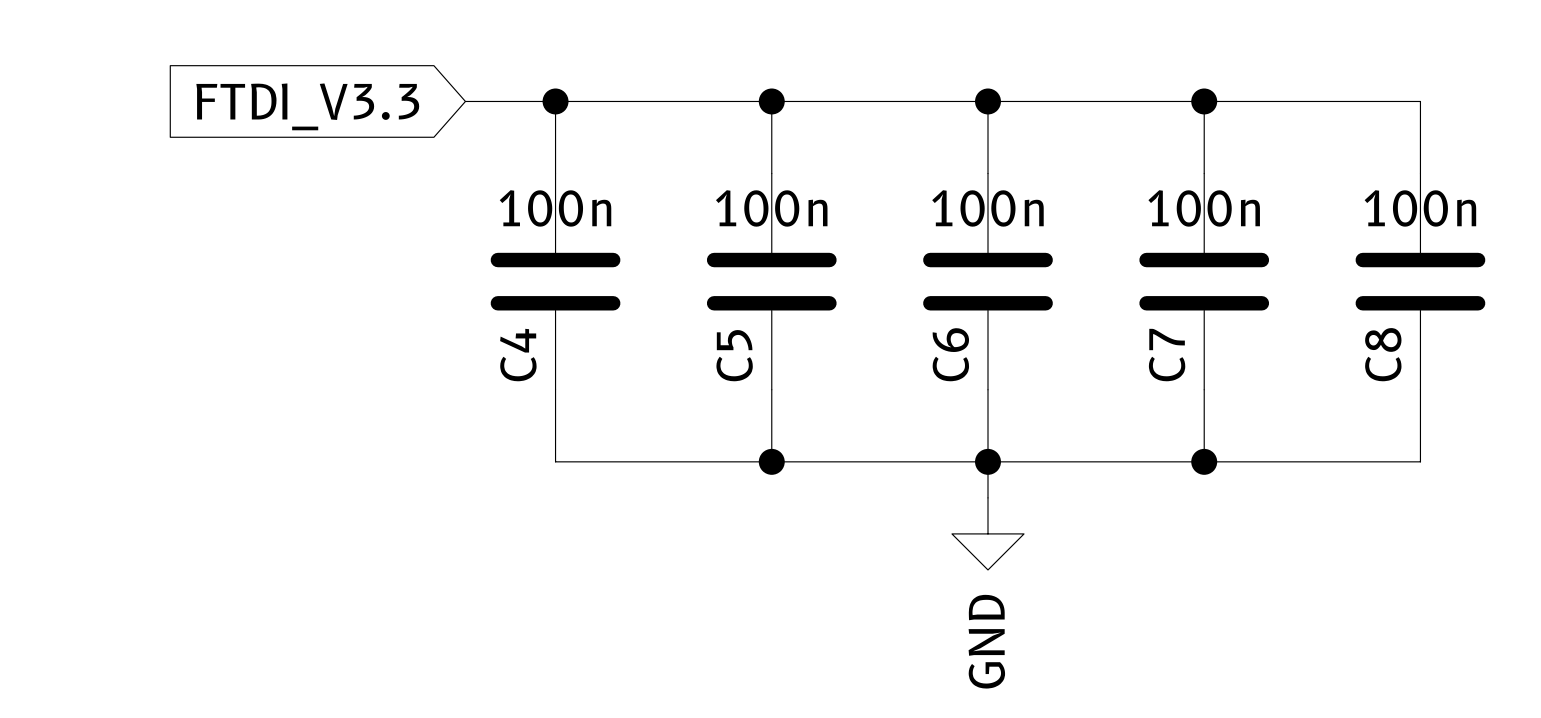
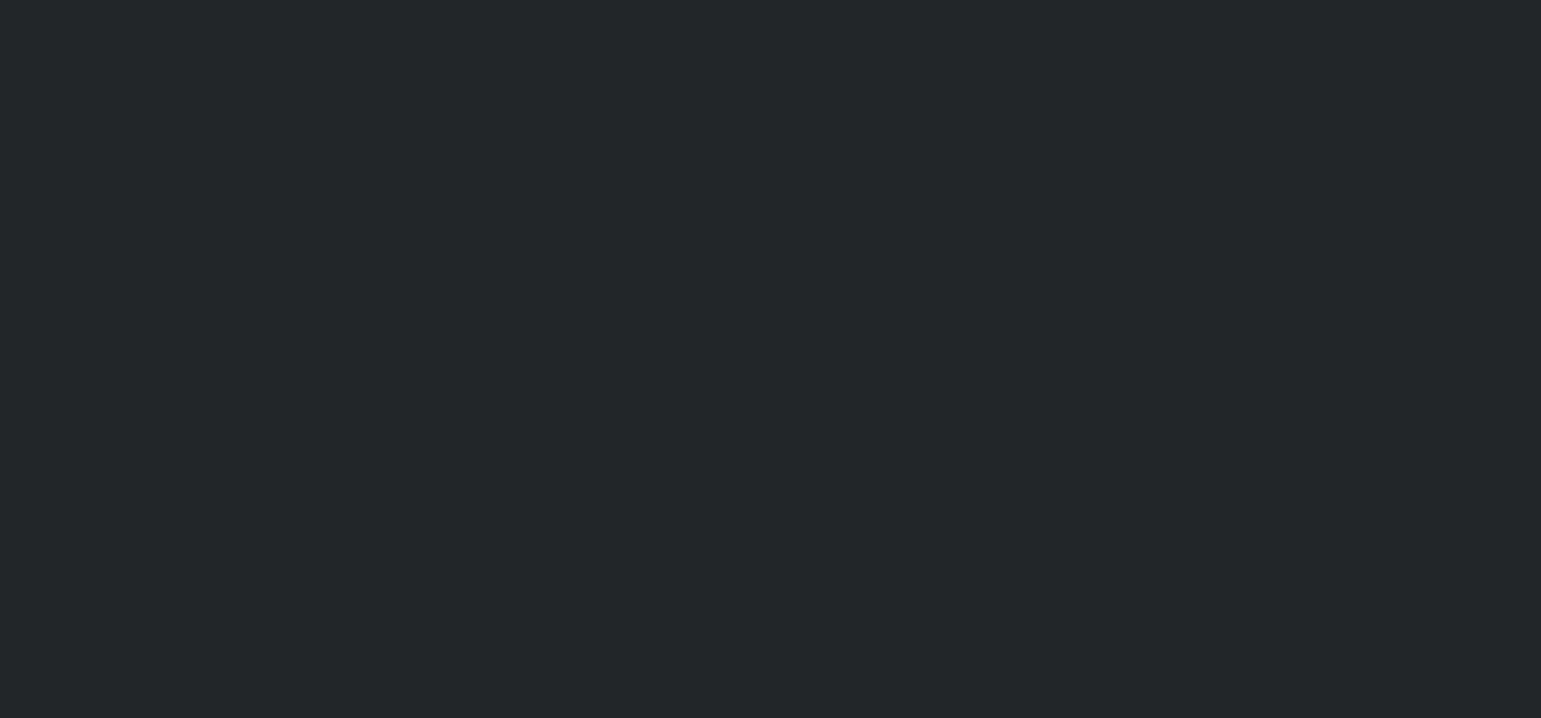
wire: (465, 101) (1420, 101) (1420, 173) -> none
wire: (555, 101) (555, 173) -> none
junction: (555, 101) -> none
wire: (771, 101) (771, 173) -> none
junction: (771, 101) -> none
wire: (987, 101) (987, 173) -> none
junction: (987, 101) -> none
wire: (1204, 101) (1204, 173) -> none
junction: (1204, 101) -> none
global label: FTDI_V3.3 (307, 106) -> none
C4: (555, 281) -> none
C5: (771, 281) -> none
C6: (987, 281) -> none
C7: (1204, 281) -> none
C8: (1420, 281) -> none
wire: (555, 389) (555, 461) (1420, 461) (1420, 389) -> none
wire: (771, 389) (771, 461) -> none
wire: (987, 389) (987, 497) -> none
wire: (1204, 389) (1204, 461) -> none
junction: (771, 461) -> none
junction: (987, 461) -> none
junction: (1204, 461) -> none
power symbol: GND (987, 533) -> none

